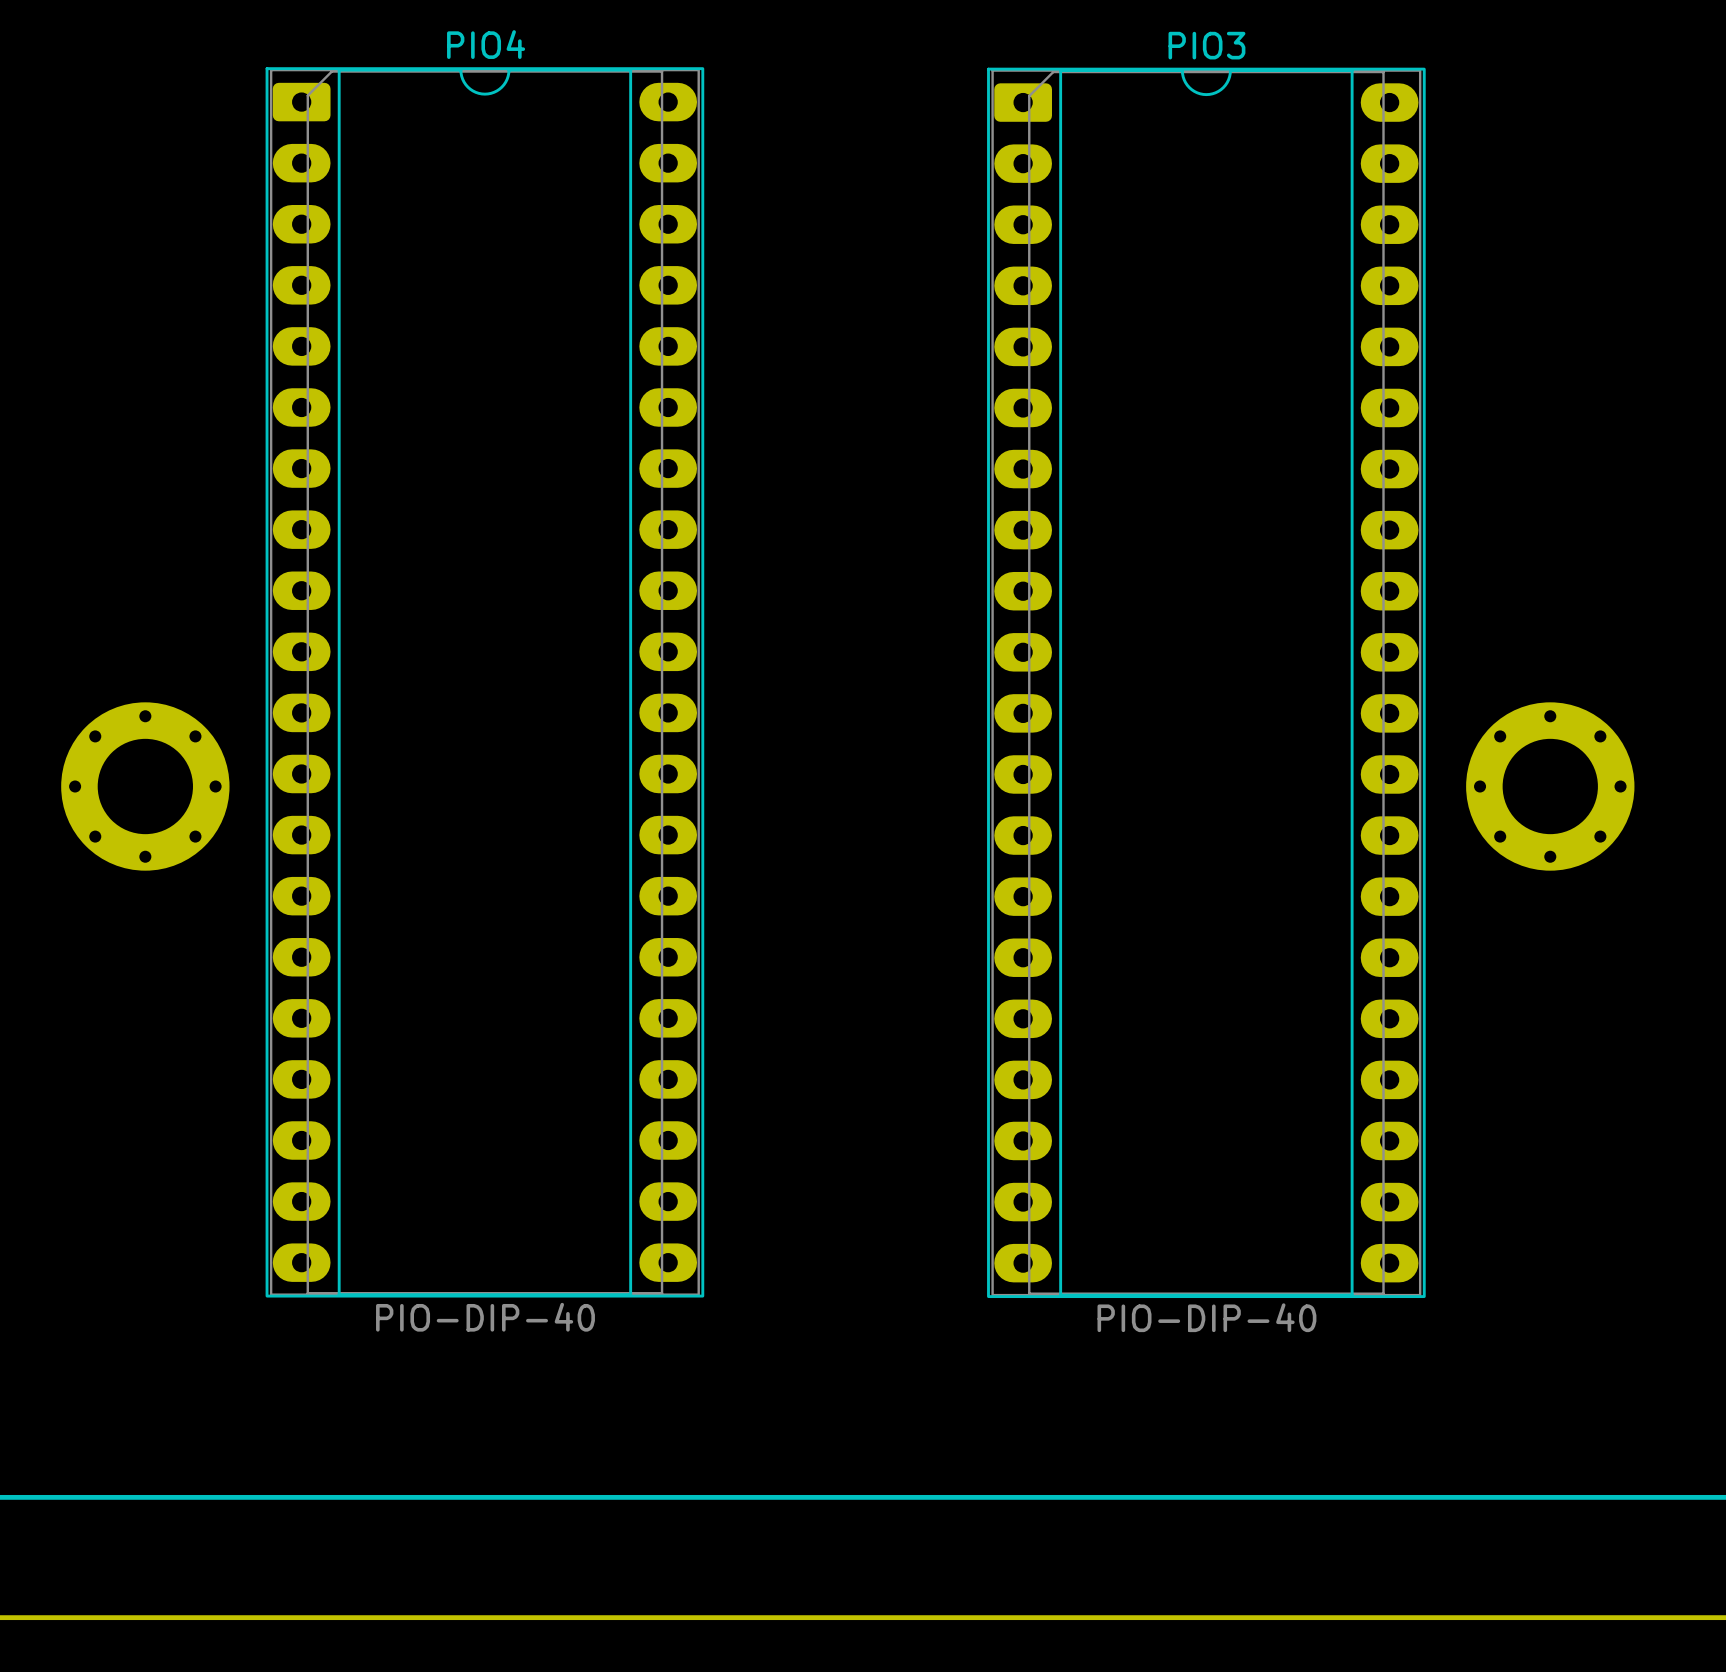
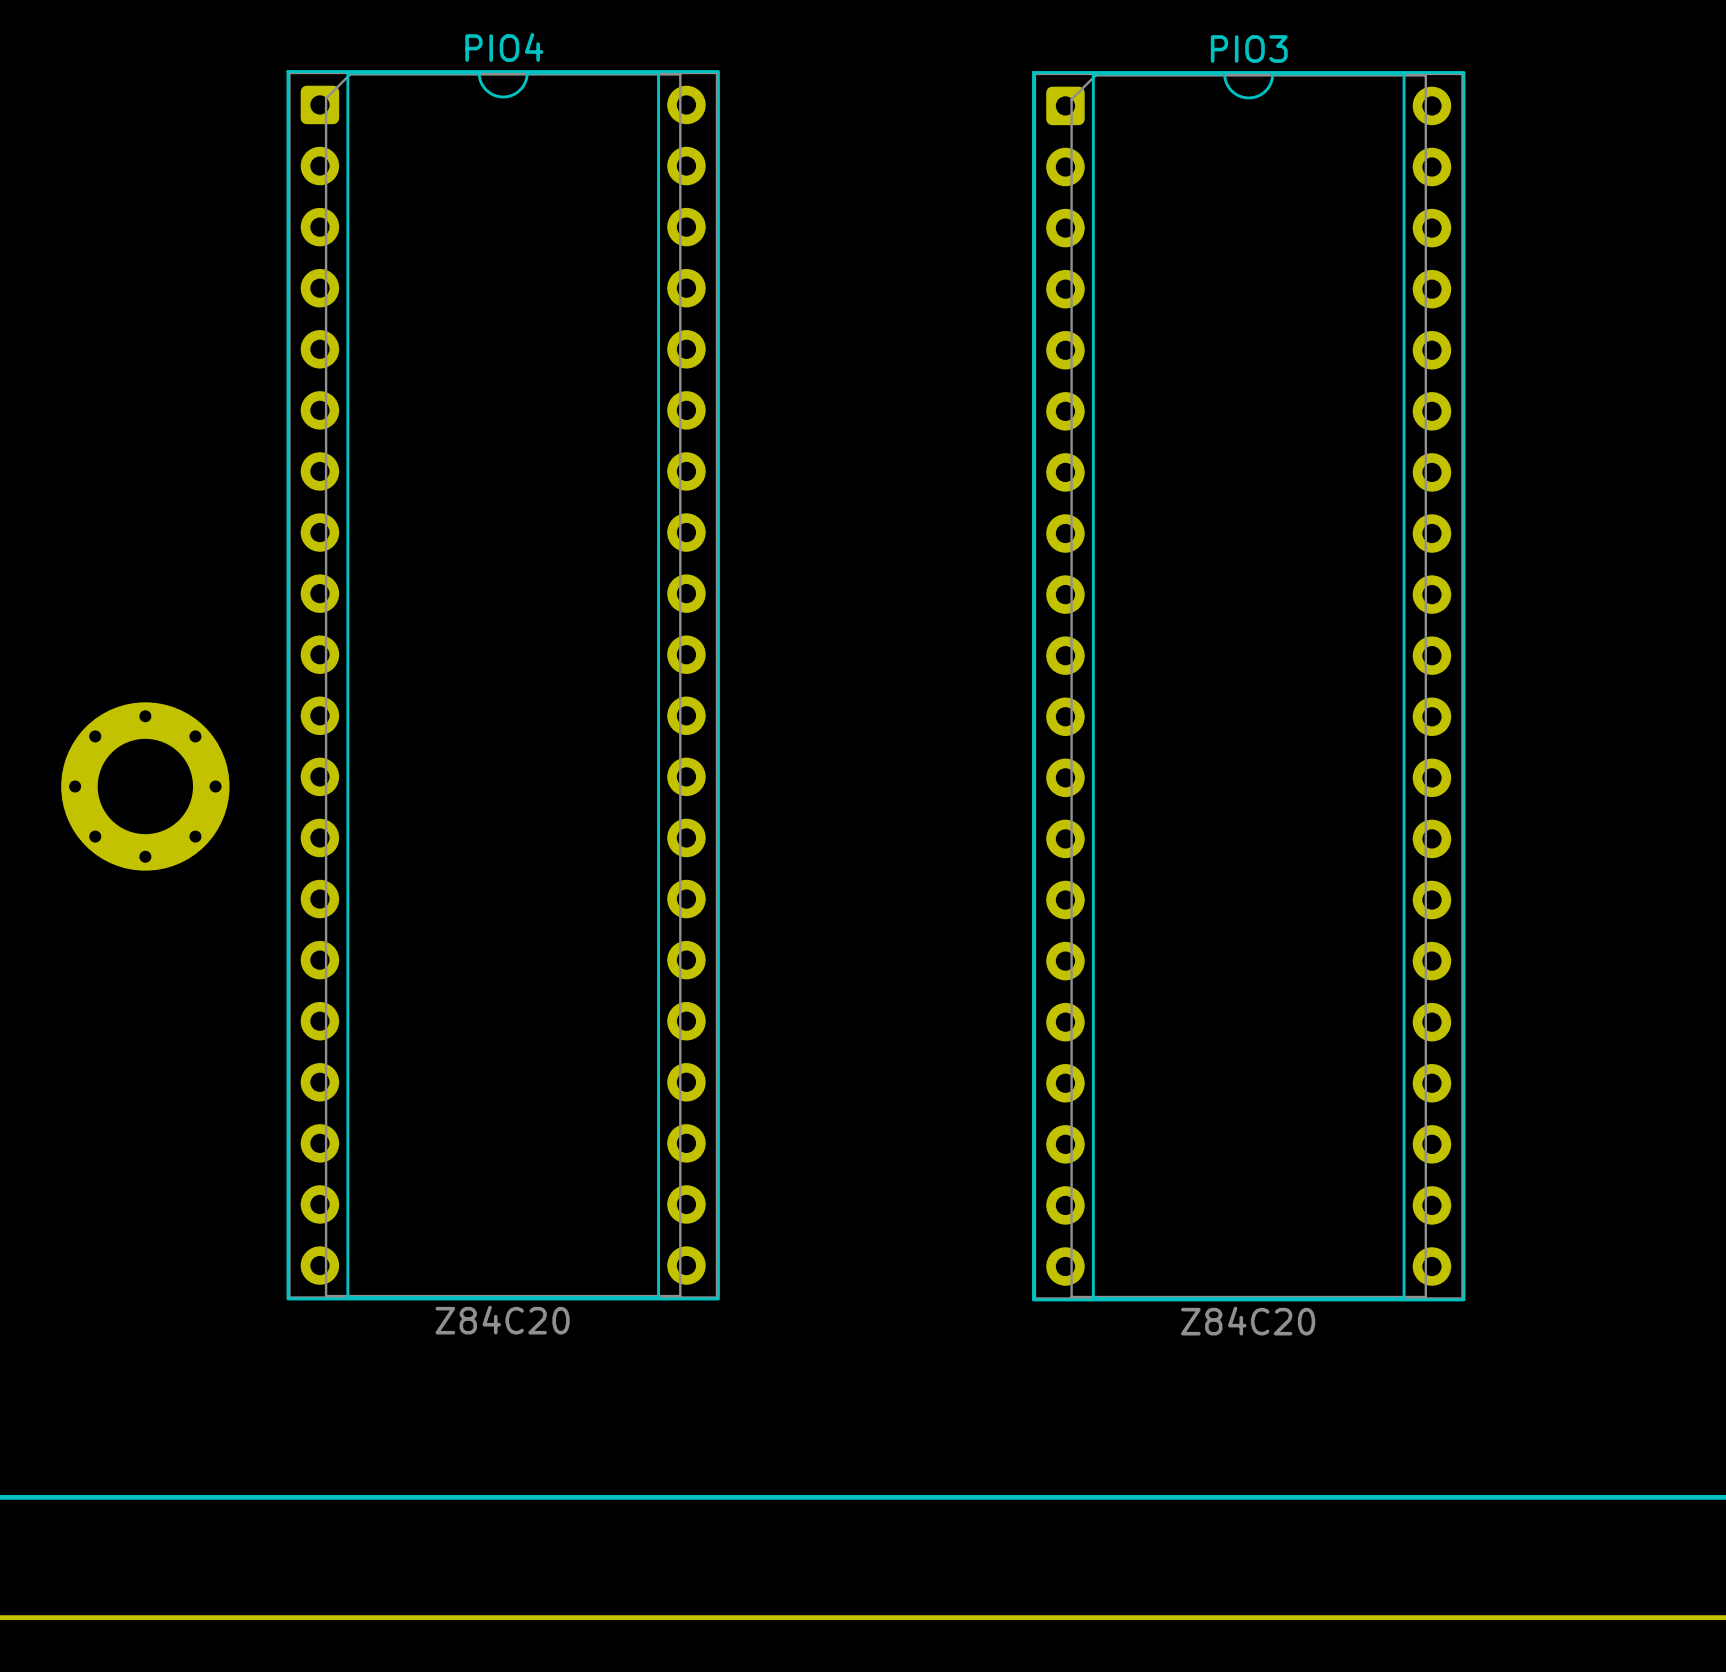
PIO4 footprint: [265, 67, 705, 1298] -> [286, 70, 720, 1301]
PIO3 footprint: [987, 67, 1426, 1299] -> [1032, 71, 1466, 1302]
part: (1550, 786) -> none
PIO4 value: PIO-DIP-40 (485, 1317) -> Z84C20 (502, 1320)
PIO3 value: PIO-DIP-40 (1206, 1317) -> Z84C20 (1248, 1321)

